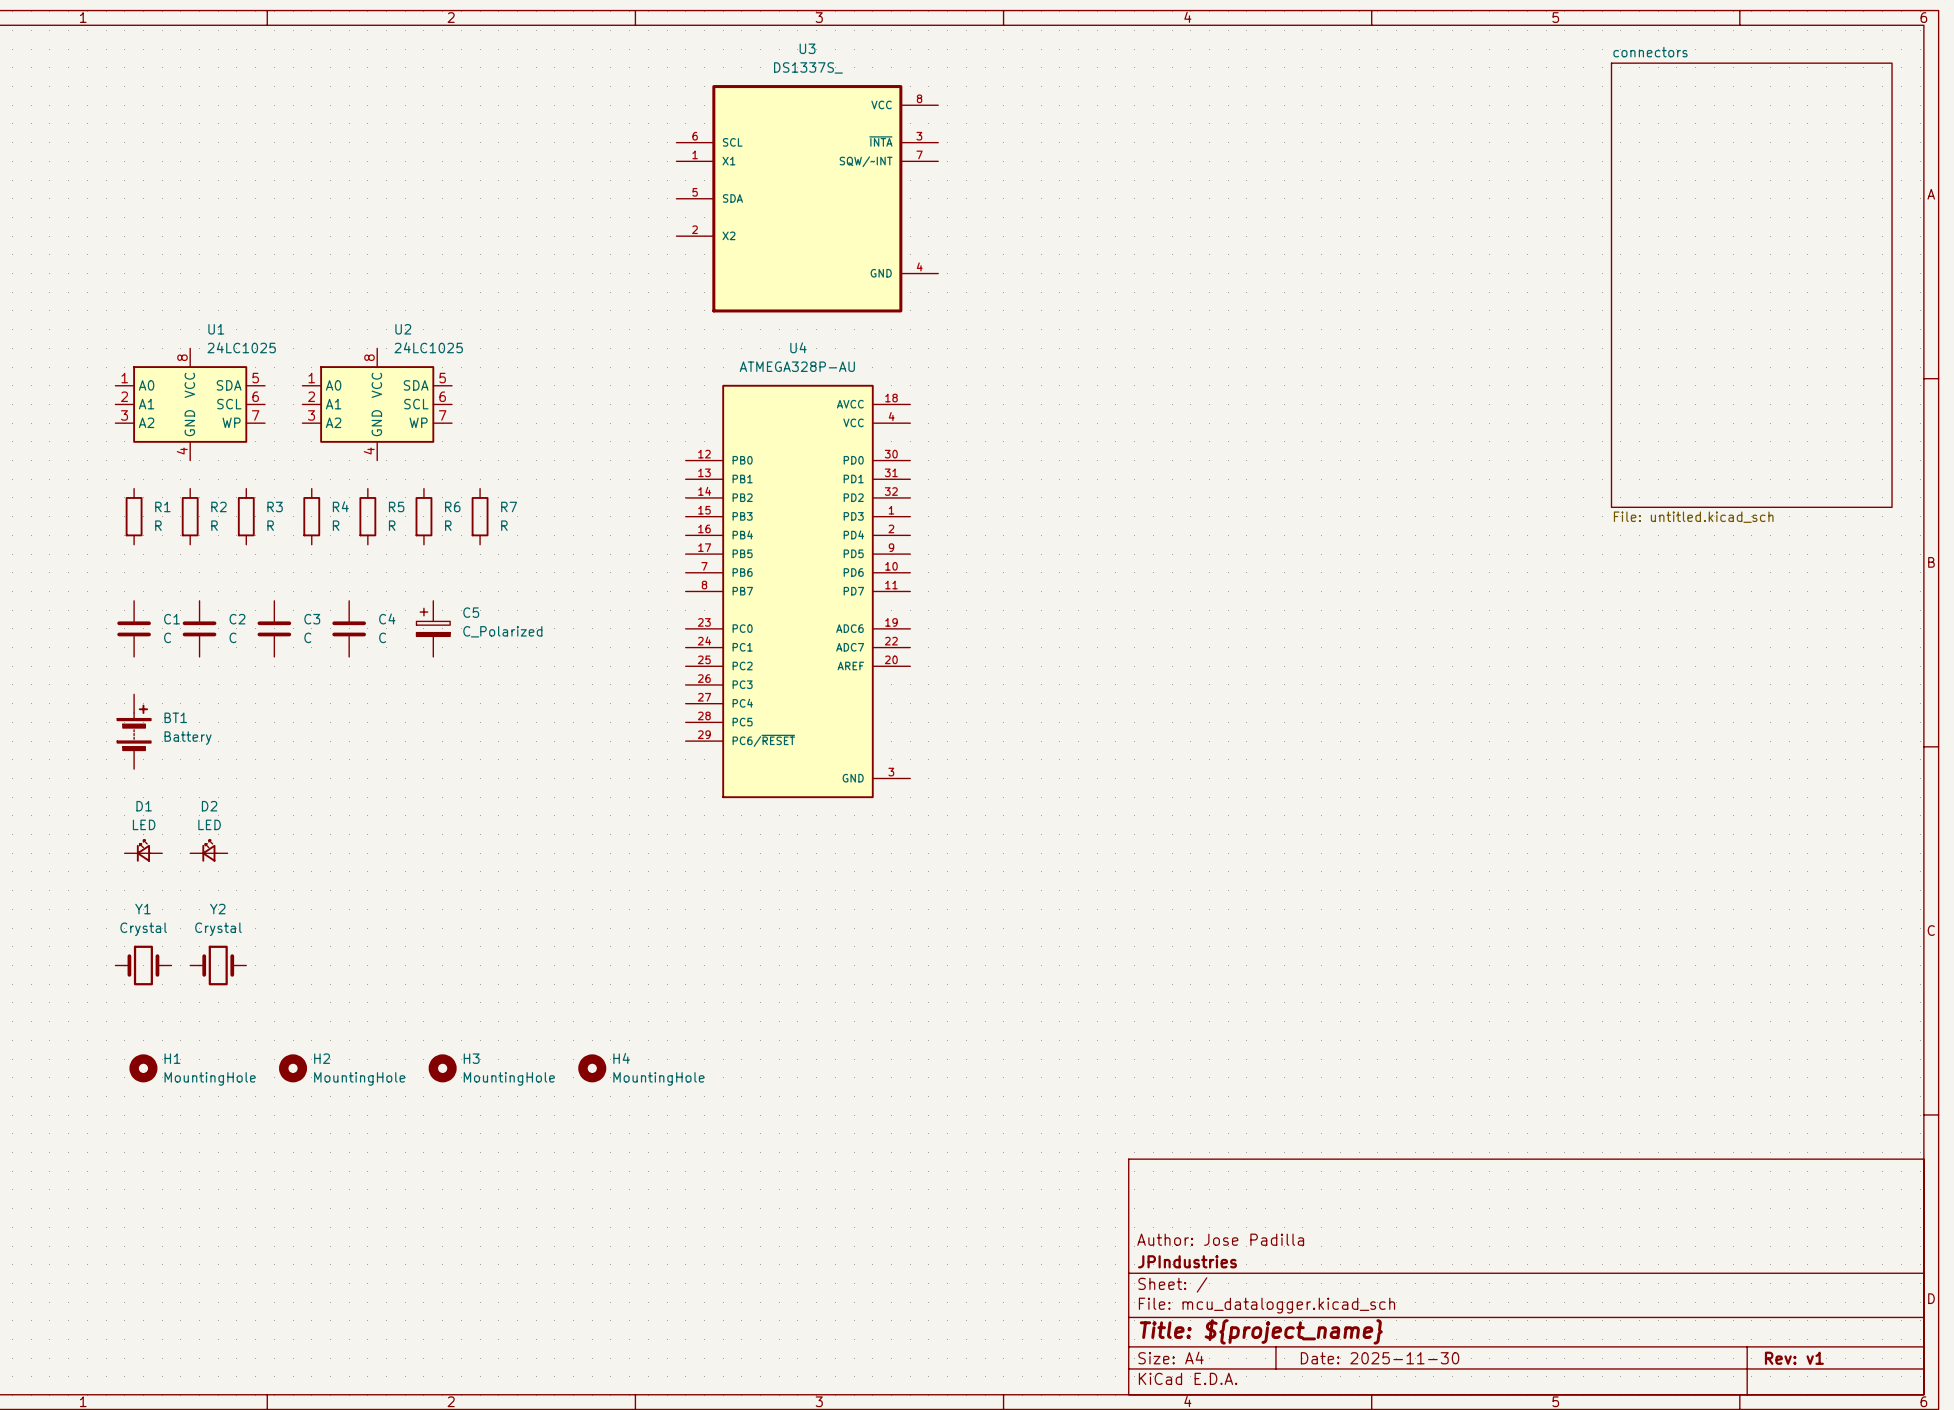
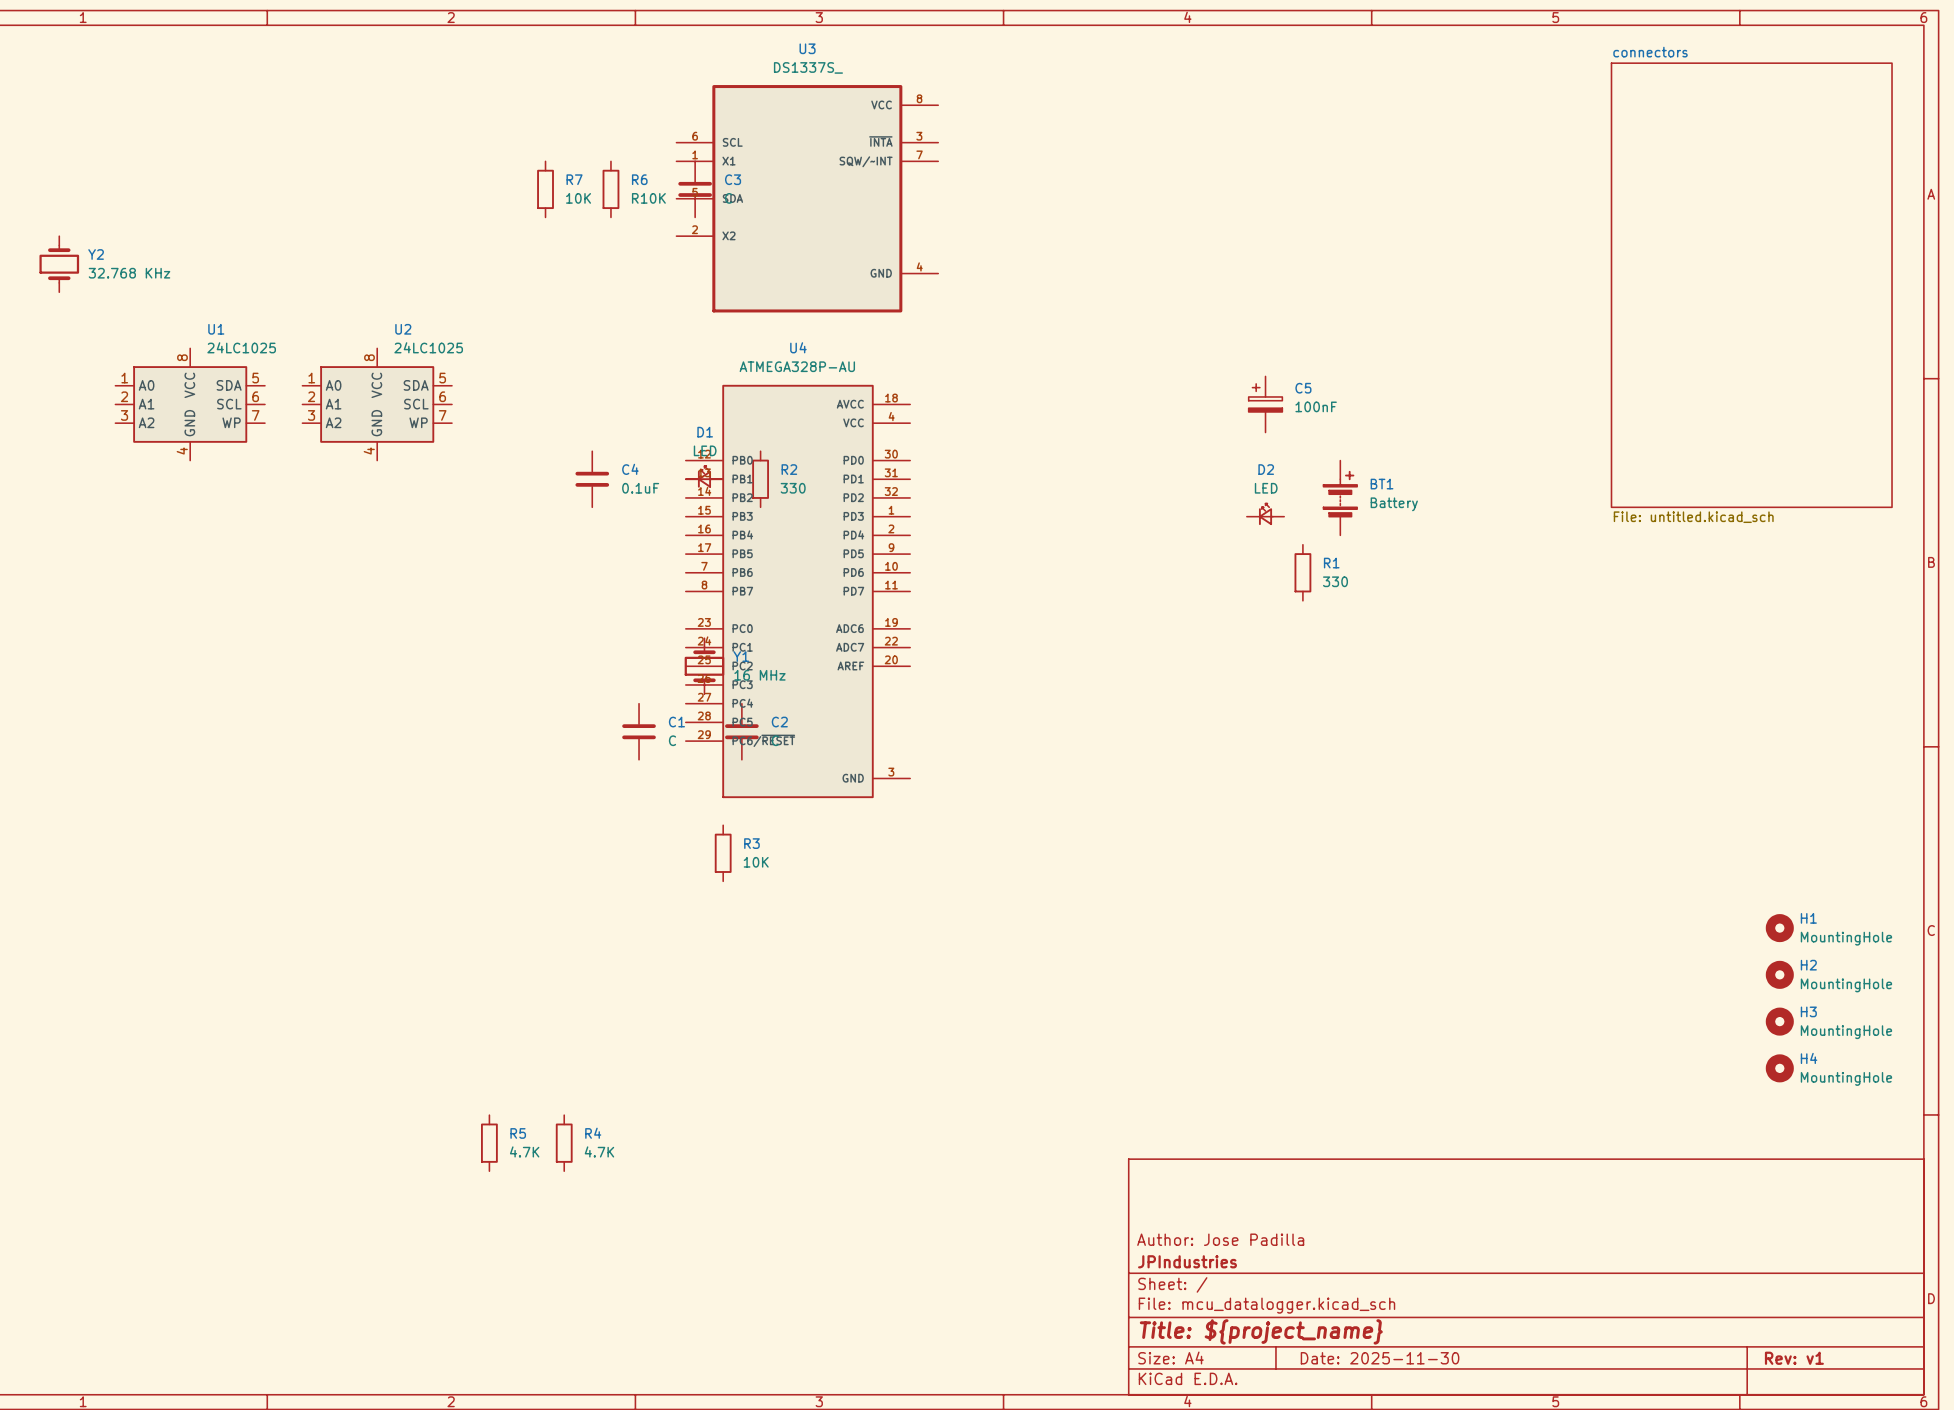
R1 position: (134, 516) -> (1302, 572)
R2 position: (190, 516) -> (760, 479)
R3 position: (246, 516) -> (723, 853)
R4 position: (311, 516) -> (564, 1143)
R5 position: (367, 516) -> (489, 1143)
R6 position: (423, 516) -> (610, 189)
R7 position: (480, 516) -> (545, 189)
R1 value: R (158, 525) -> 330 (1335, 581)
R2 value: R (214, 525) -> 330 (793, 488)
R3 value: R (270, 525) -> 10K (756, 862)
R4 value: R (336, 525) -> 4.7K (599, 1151)
R5 value: R (392, 525) -> 4.7K (524, 1151)
R6 value: R (448, 525) -> R10K (648, 198)
R7 value: R (504, 525) -> 10K (578, 198)
C1 position: (134, 628) -> (639, 731)
C2 position: (199, 628) -> (741, 731)
C3 position: (274, 628) -> (695, 189)
C4 position: (349, 628) -> (592, 479)
C5 position: (433, 628) -> (1265, 404)
C5 value: C_Polarized (502, 631) -> 100nF (1316, 406)
C4 value: C (382, 637) -> 0.1uF (640, 488)
BT1 position: (134, 731) -> (1340, 497)
D1 position: (143, 850) -> (704, 476)
D2 position: (208, 850) -> (1265, 514)
Y1 name position: Y1 (142, 909) -> Y1 (741, 656)
Y2 name position: Y2 (217, 909) -> Y2 (96, 254)
Y1 value: Crystal (143, 929) -> 16 MHz (759, 675)
Y2 value: Crystal (218, 929) -> 32.768 KHz (129, 273)
Y1 rotation: 0° (143, 965) -> 90° clockwise (704, 666)
Y1 position: (143, 965) -> (704, 666)
Y2 rotation: 0° (218, 965) -> 90° clockwise (59, 264)
Y2 position: (218, 965) -> (59, 264)
H1 position: (143, 1068) -> (1779, 928)
H2 position: (293, 1068) -> (1779, 974)
H3 position: (442, 1068) -> (1779, 1021)
H4 position: (592, 1068) -> (1779, 1068)

